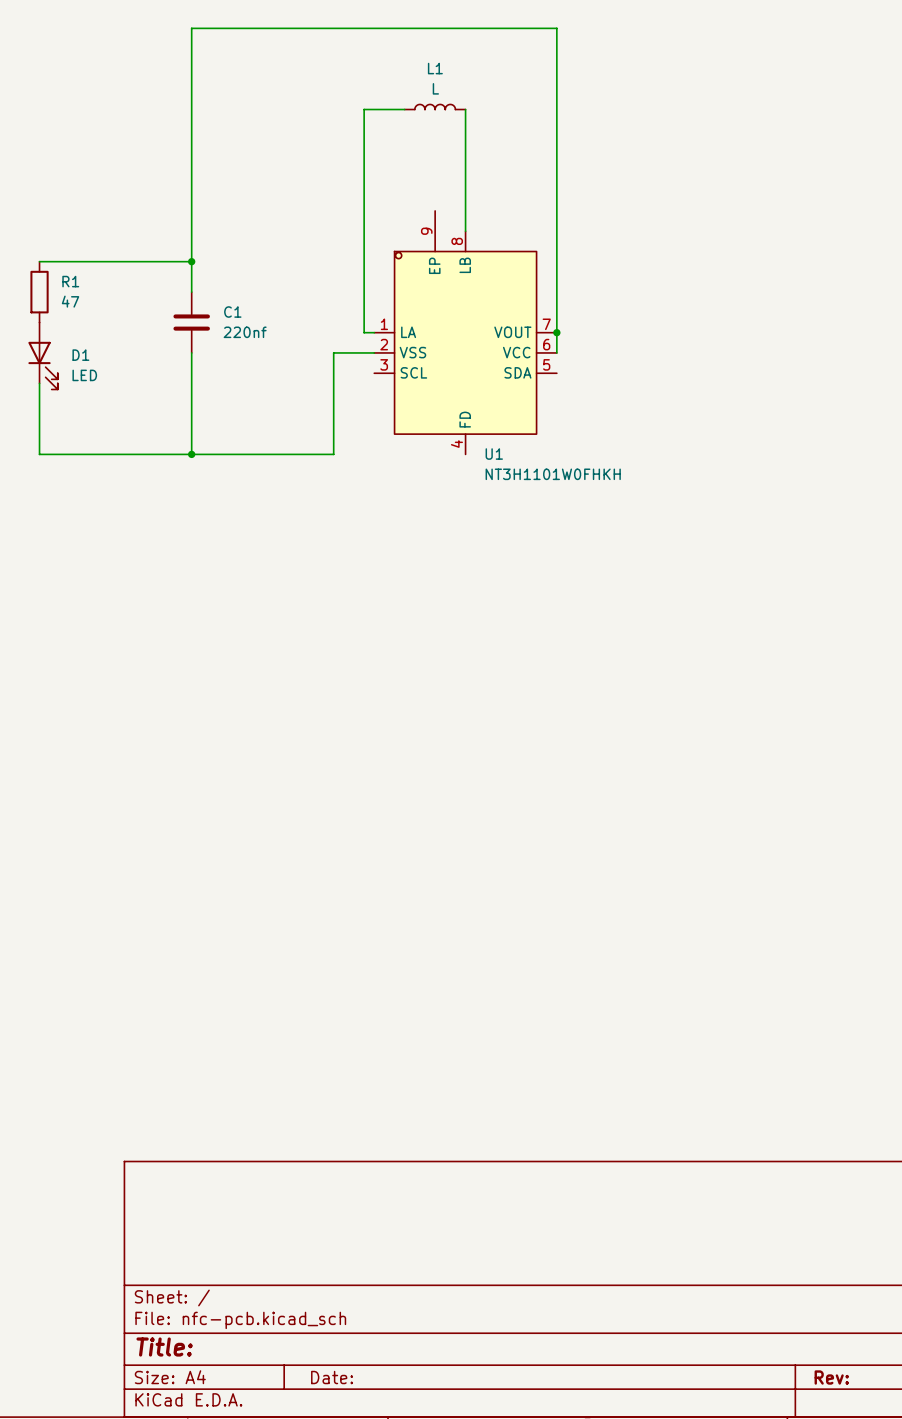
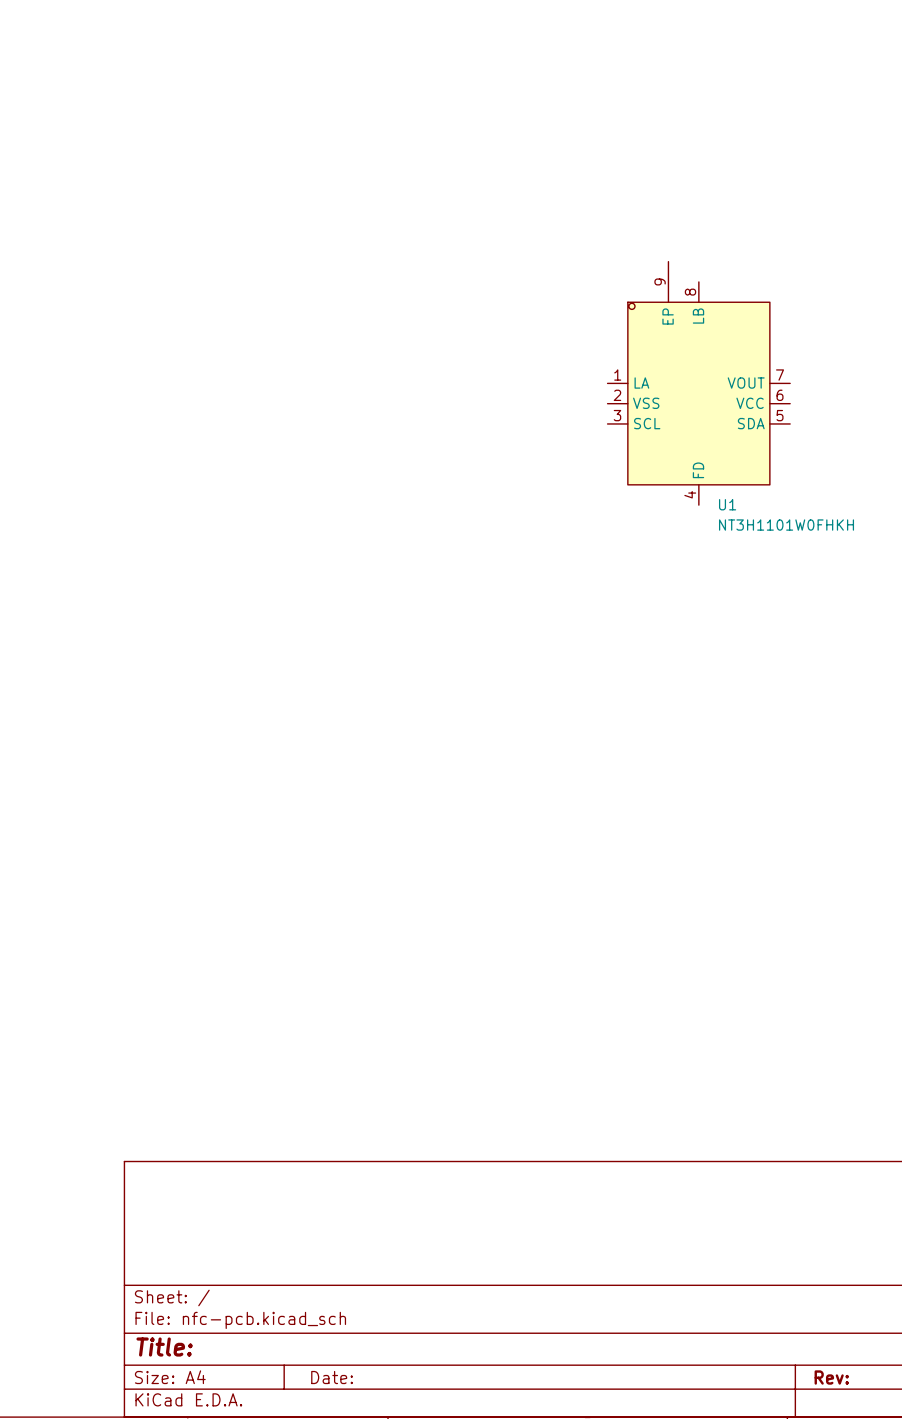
L1: L (435, 106) -> none
wire: (404, 109) (364, 109) (364, 332) (374, 332) -> none
wire: (465, 109) (465, 231) -> none
wire: (39, 261) (191, 261) -> none
junction: (191, 261) -> none
R1: 47 (39, 292) -> none
wire: (191, 292) (191, 28) (556, 28) (556, 352) -> none
C1: 220nf (191, 322) -> none
U1 position: (465, 332) -> (698, 383)
junction: (556, 332) -> none
wire: (191, 352) (191, 454) -> none
wire: (374, 352) (333, 352) (333, 454) (39, 454) (39, 383) -> none
D1: LED (43, 356) -> none
junction: (191, 454) -> none

